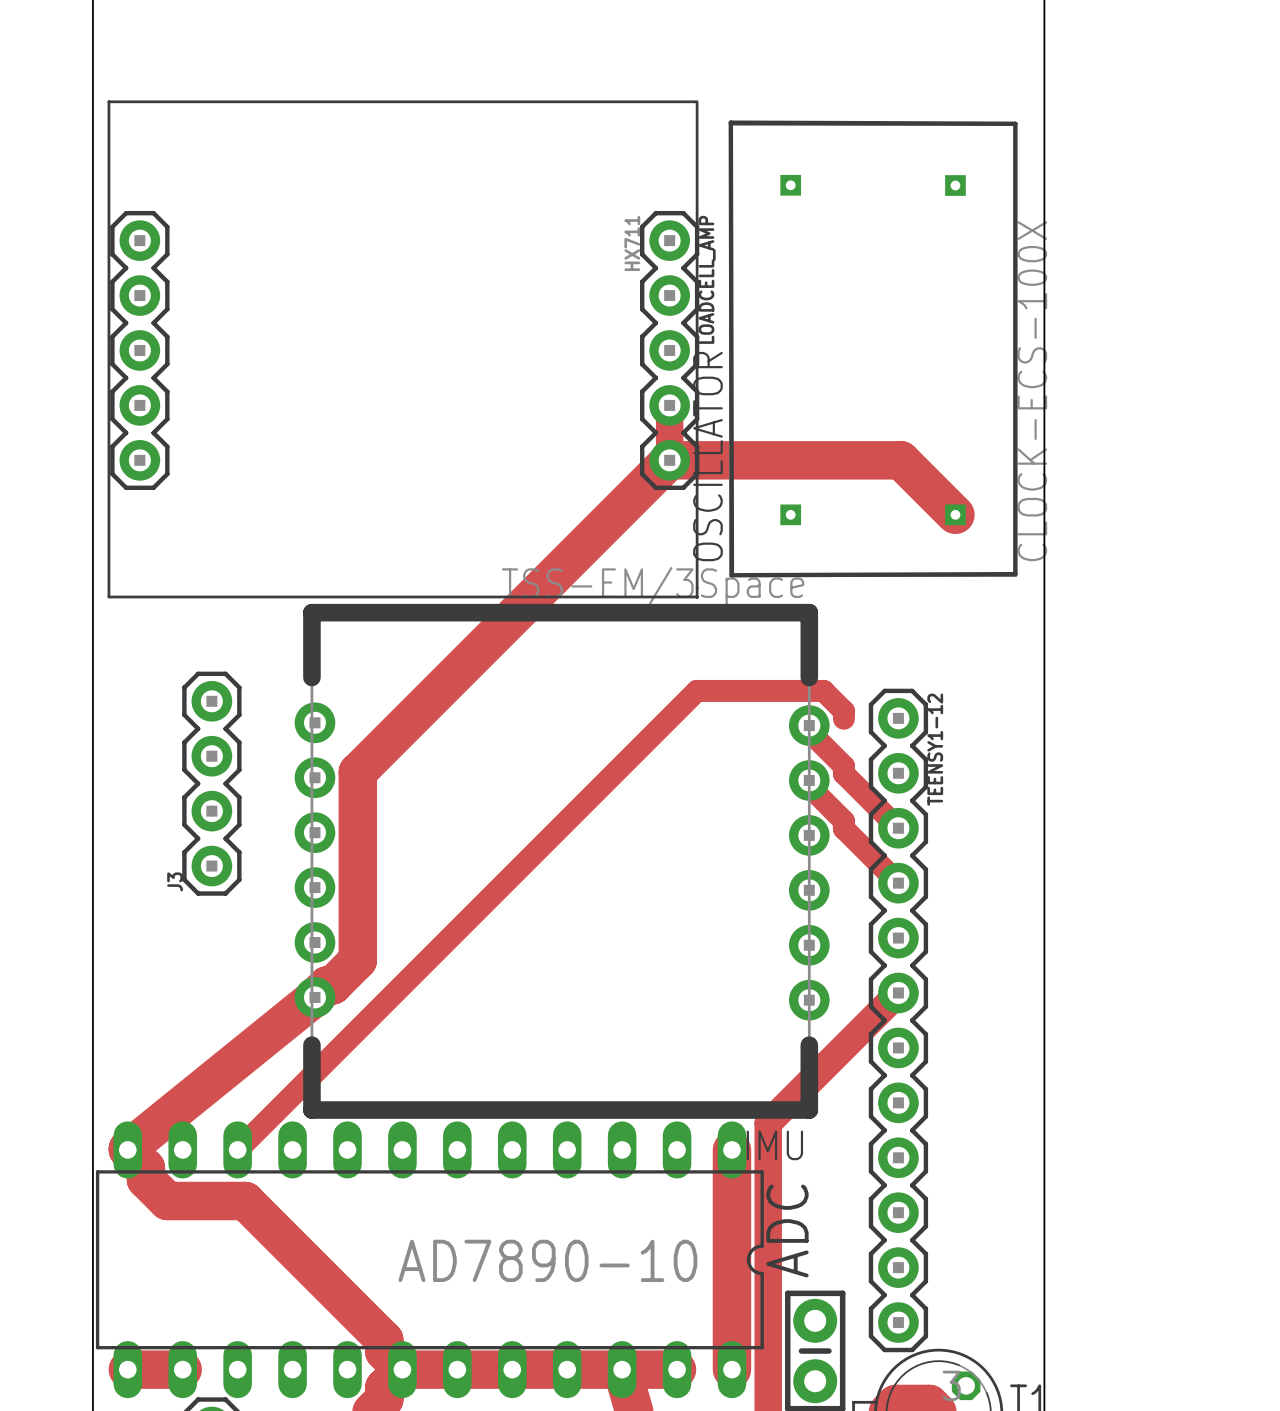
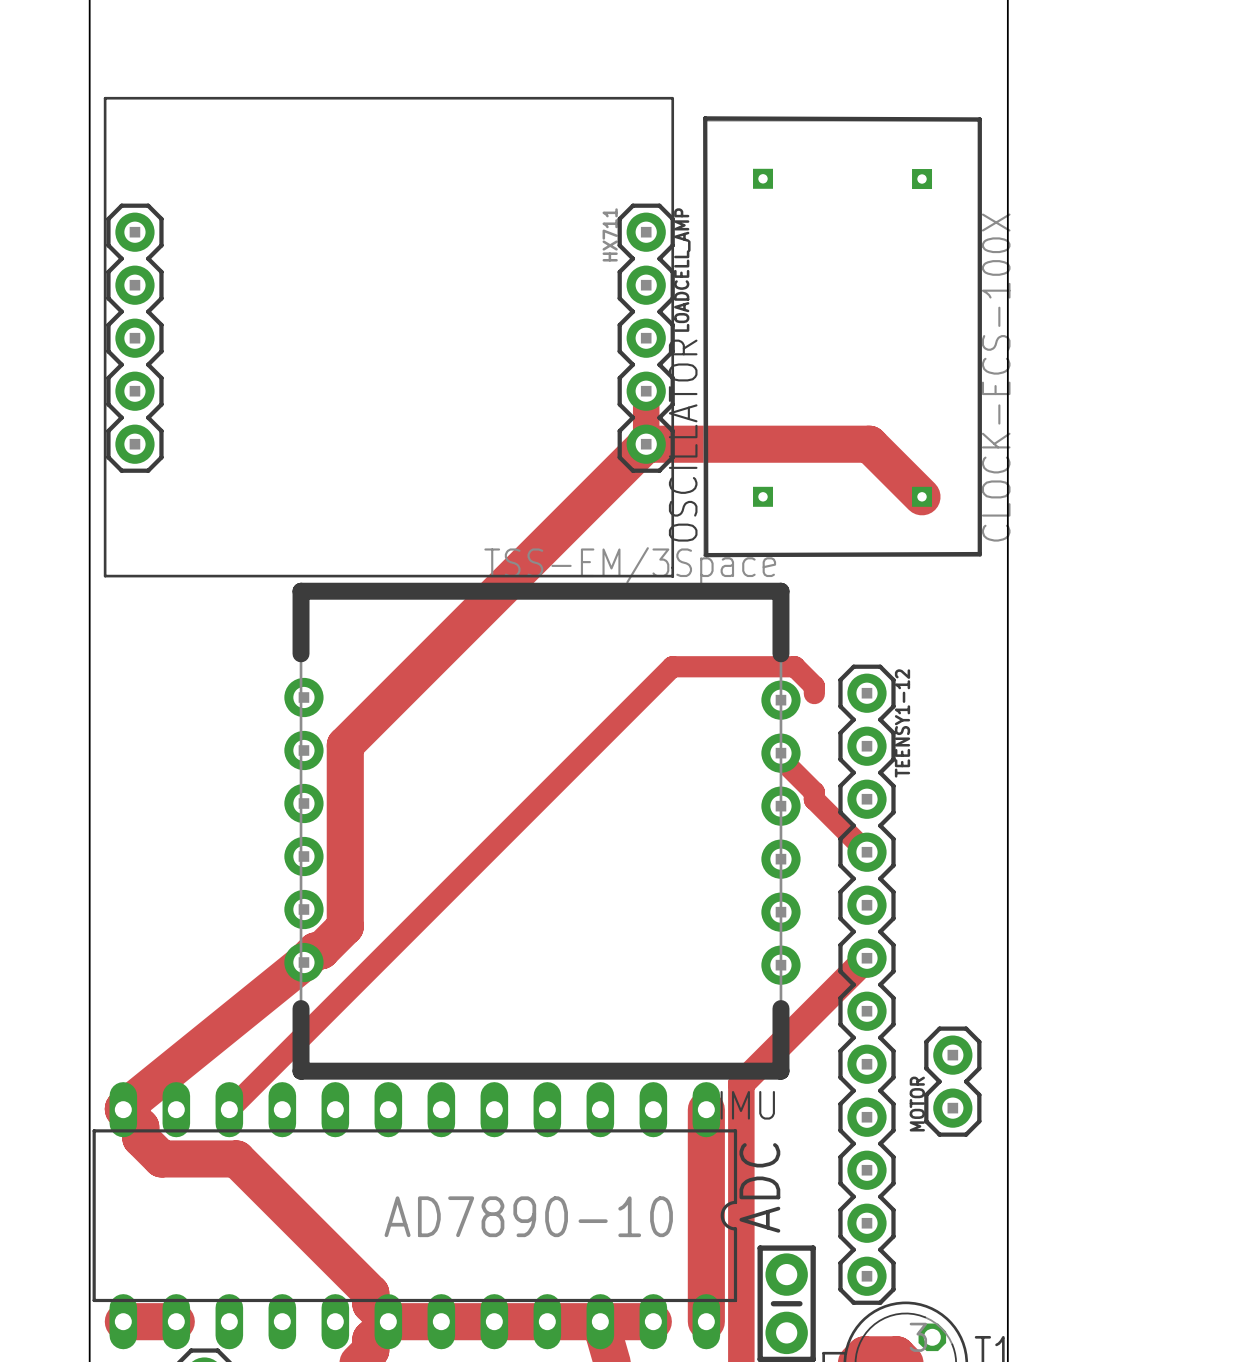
track: (809, 731) (843, 766) (843, 773) (898, 828) -> none
J3: (211, 783) -> none
MOTOR: none -> (952, 1081)

